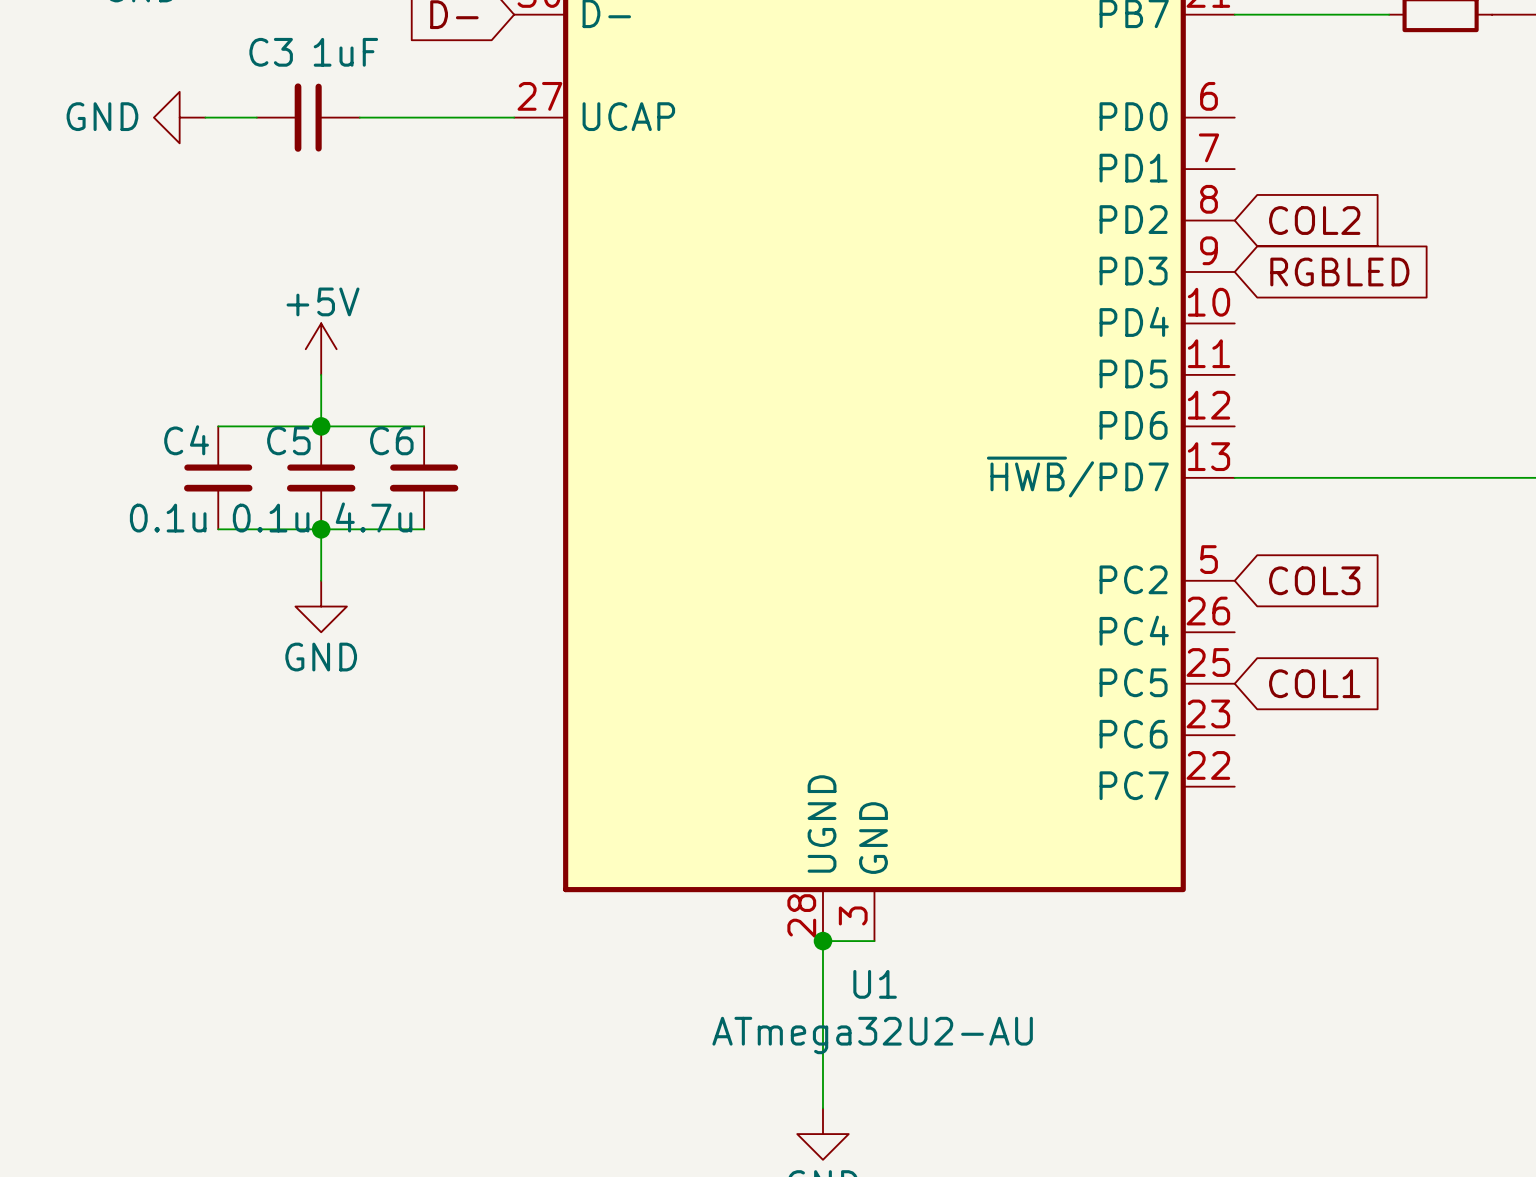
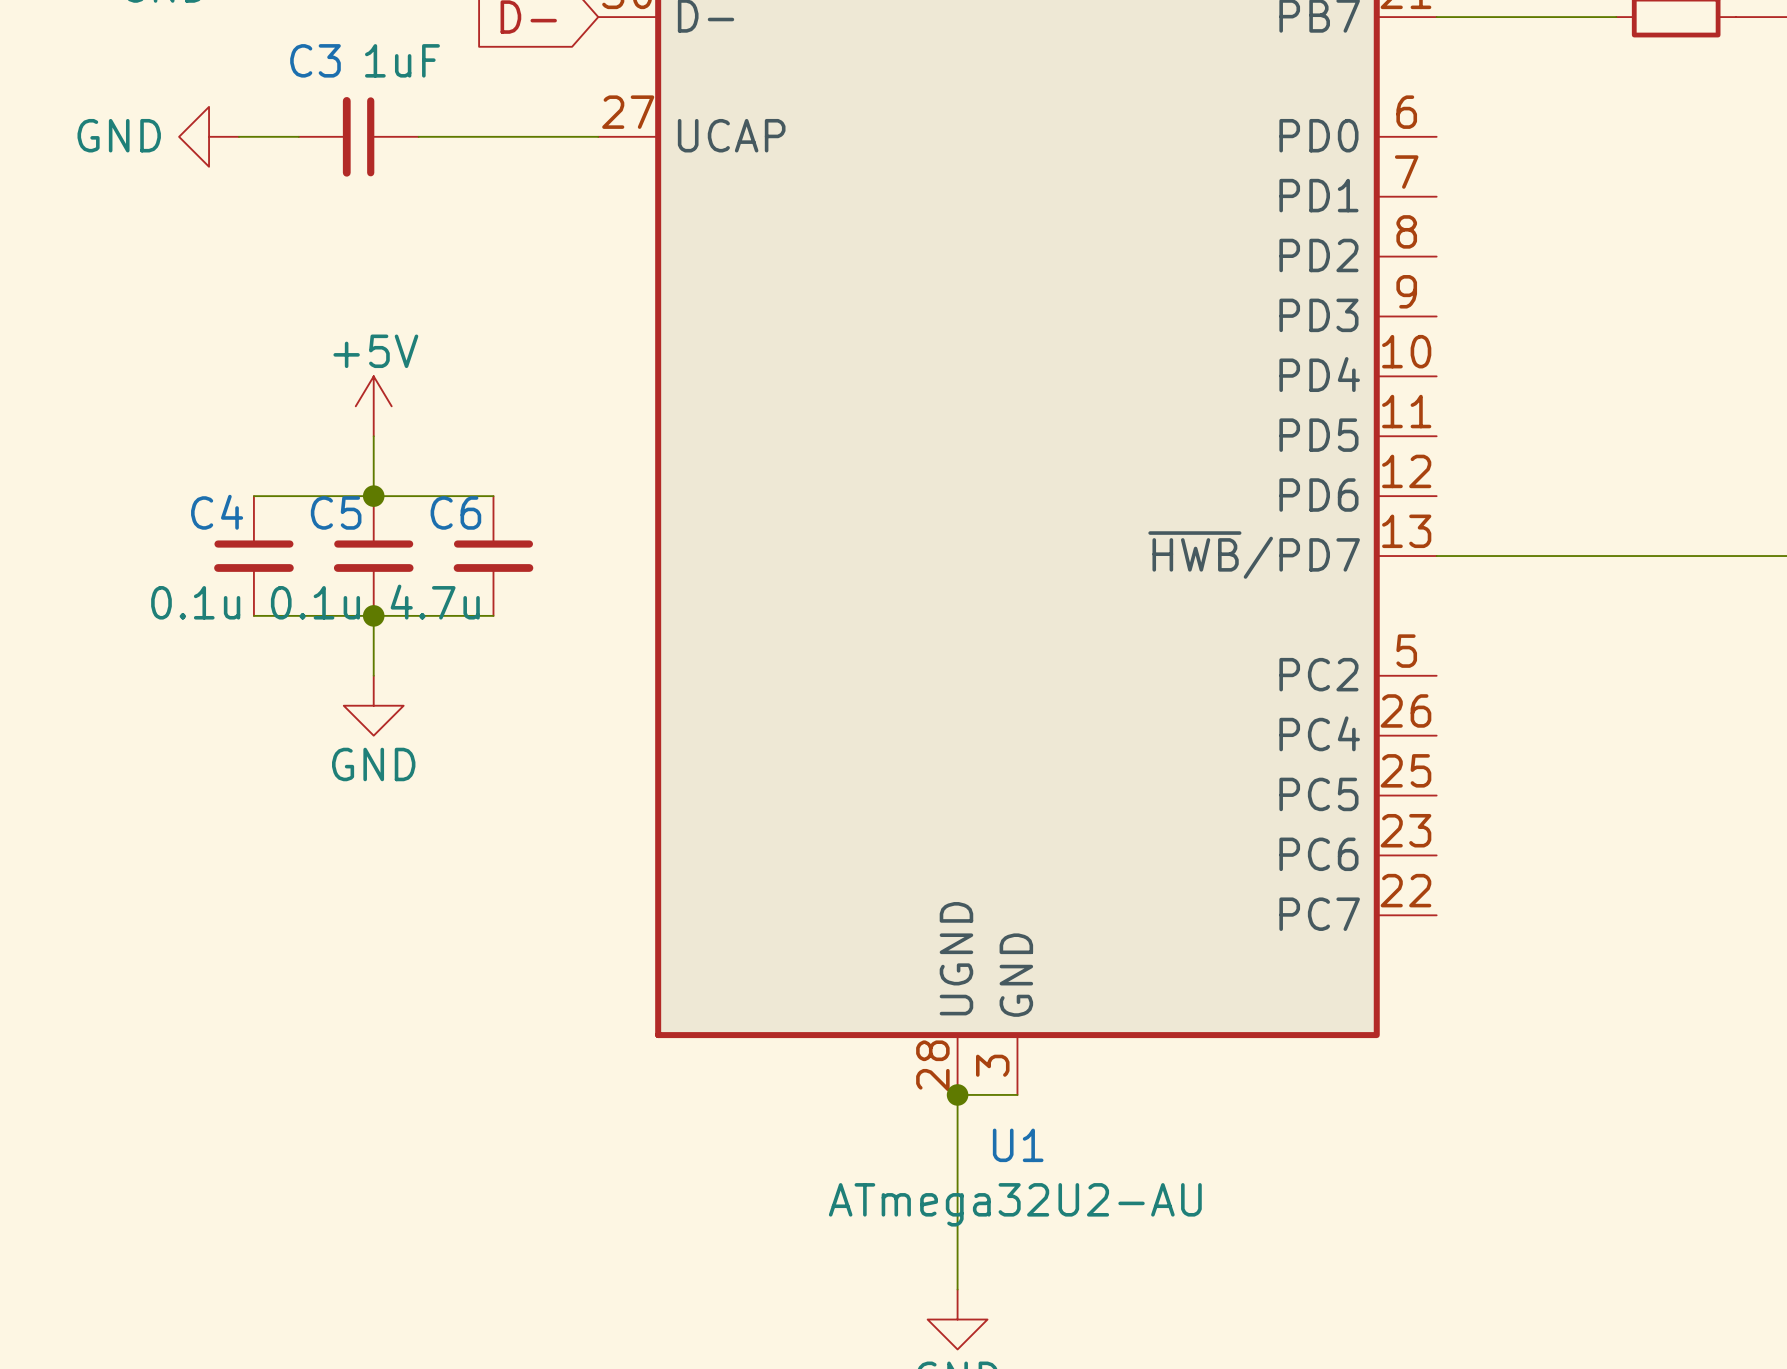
global label: COL2 (1314, 220) -> none
global label: RGBLED (1339, 272) -> none
global label: COL3 (1314, 580) -> none
global label: COL1 (1314, 683) -> none

